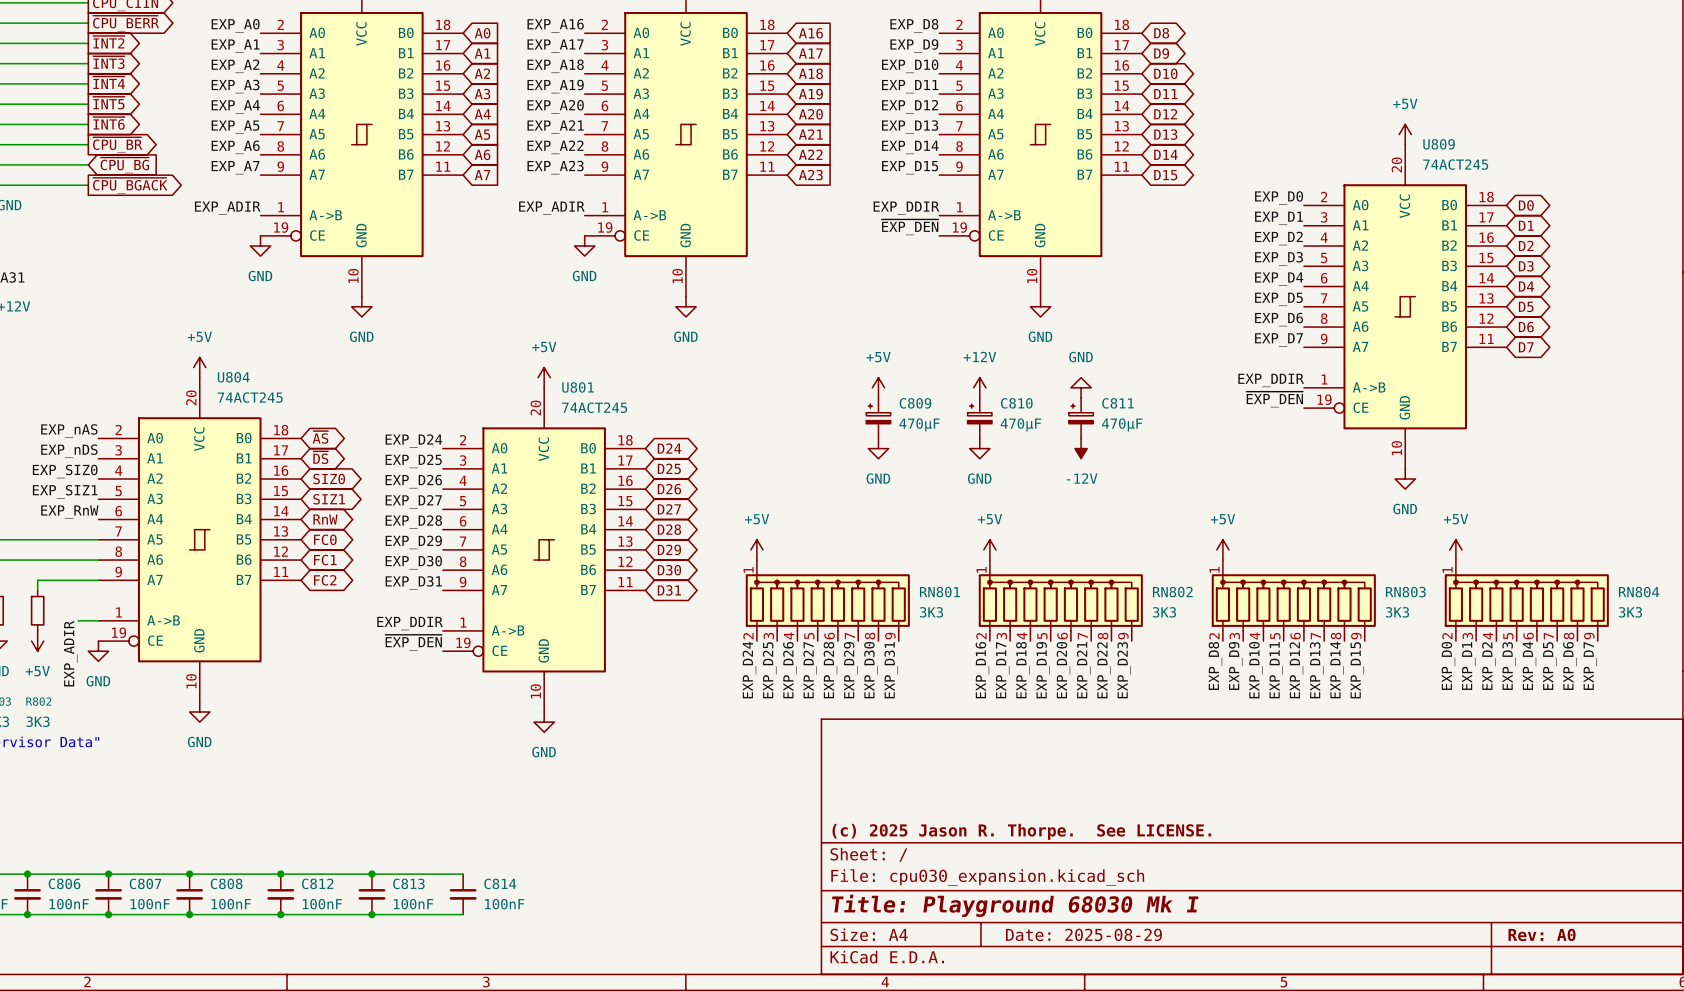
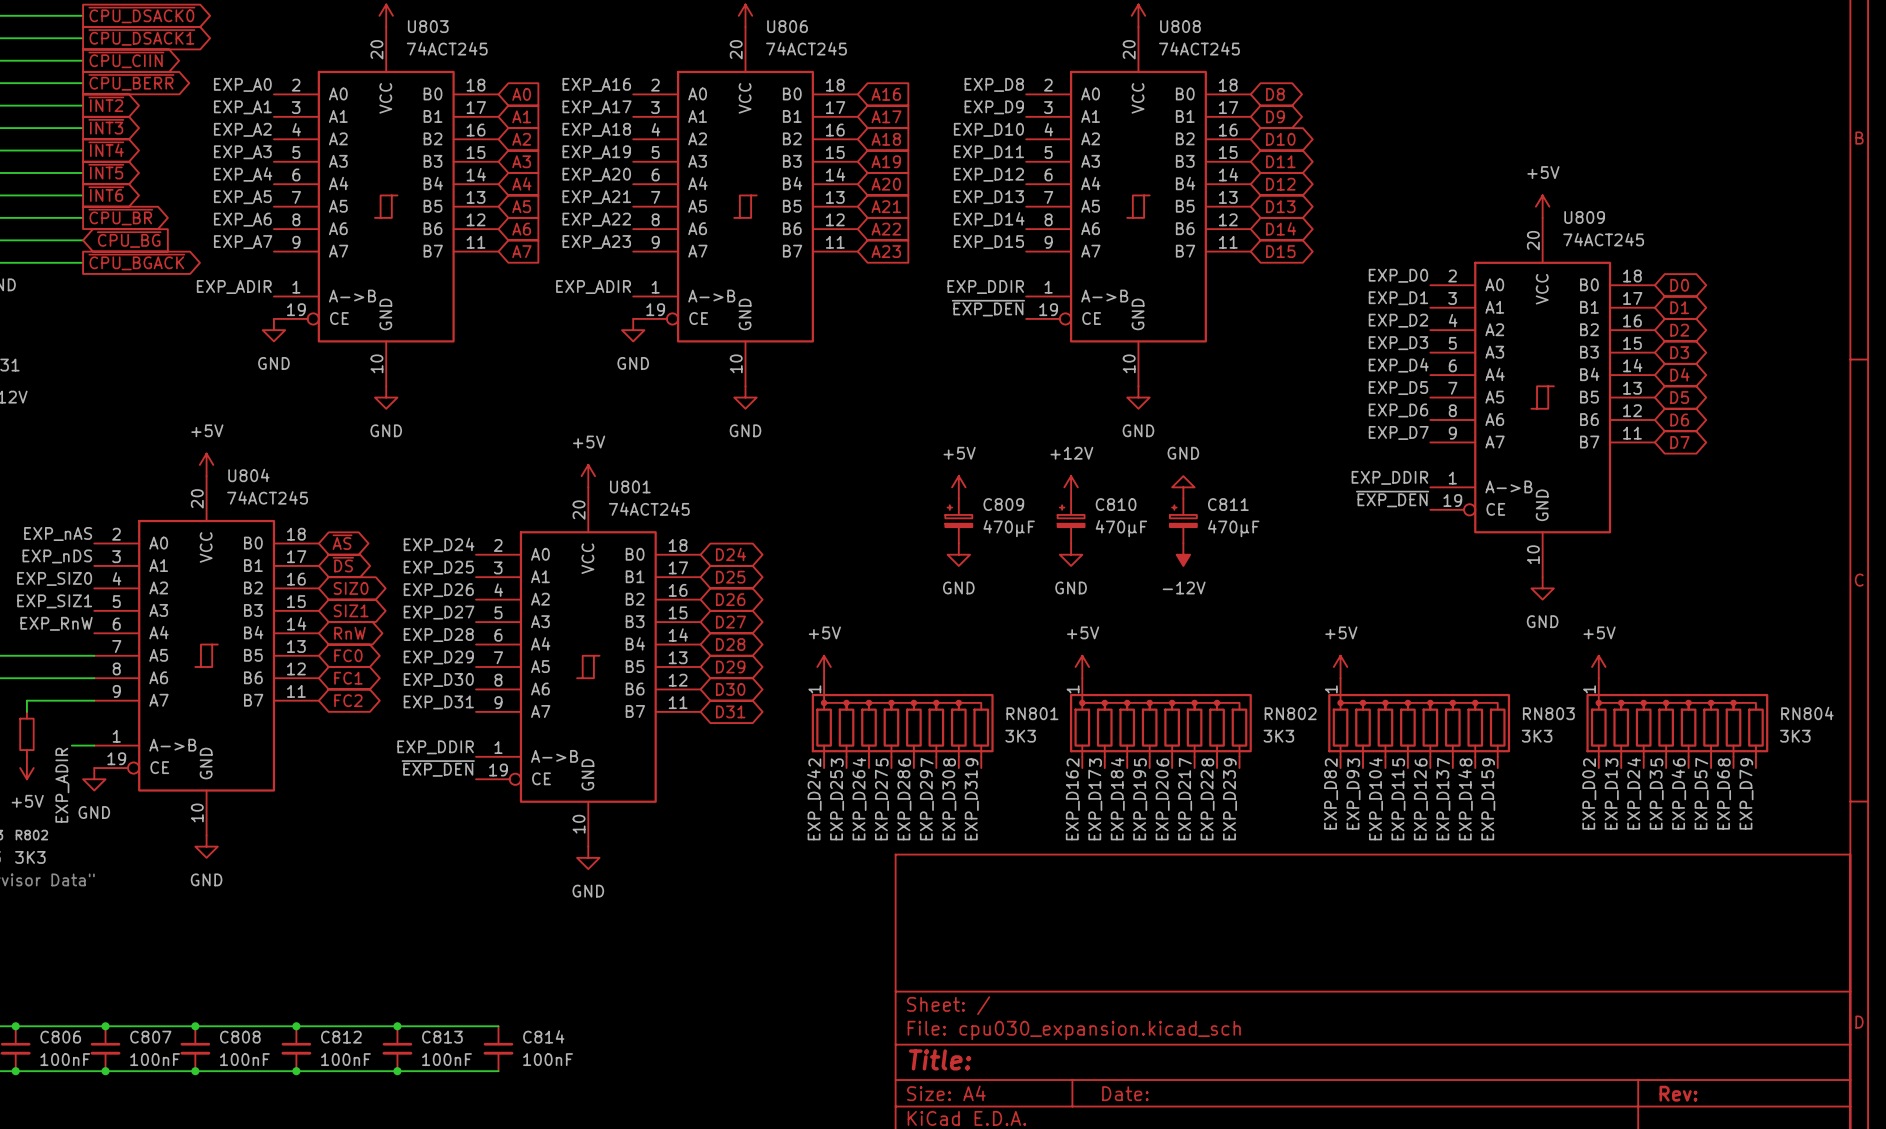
title block: (c) 2025 Jason R. Thorpe. See LICENSE. (1021, 831) -> none
title block: Title: Playground 68030 Mk I (1015, 905) -> Title: (940, 1059)
title block: Date: 2025-08-29 (1083, 934) -> Date: (1125, 1093)
title block: Rev: A0 (1542, 934) -> Rev: (1678, 1093)

